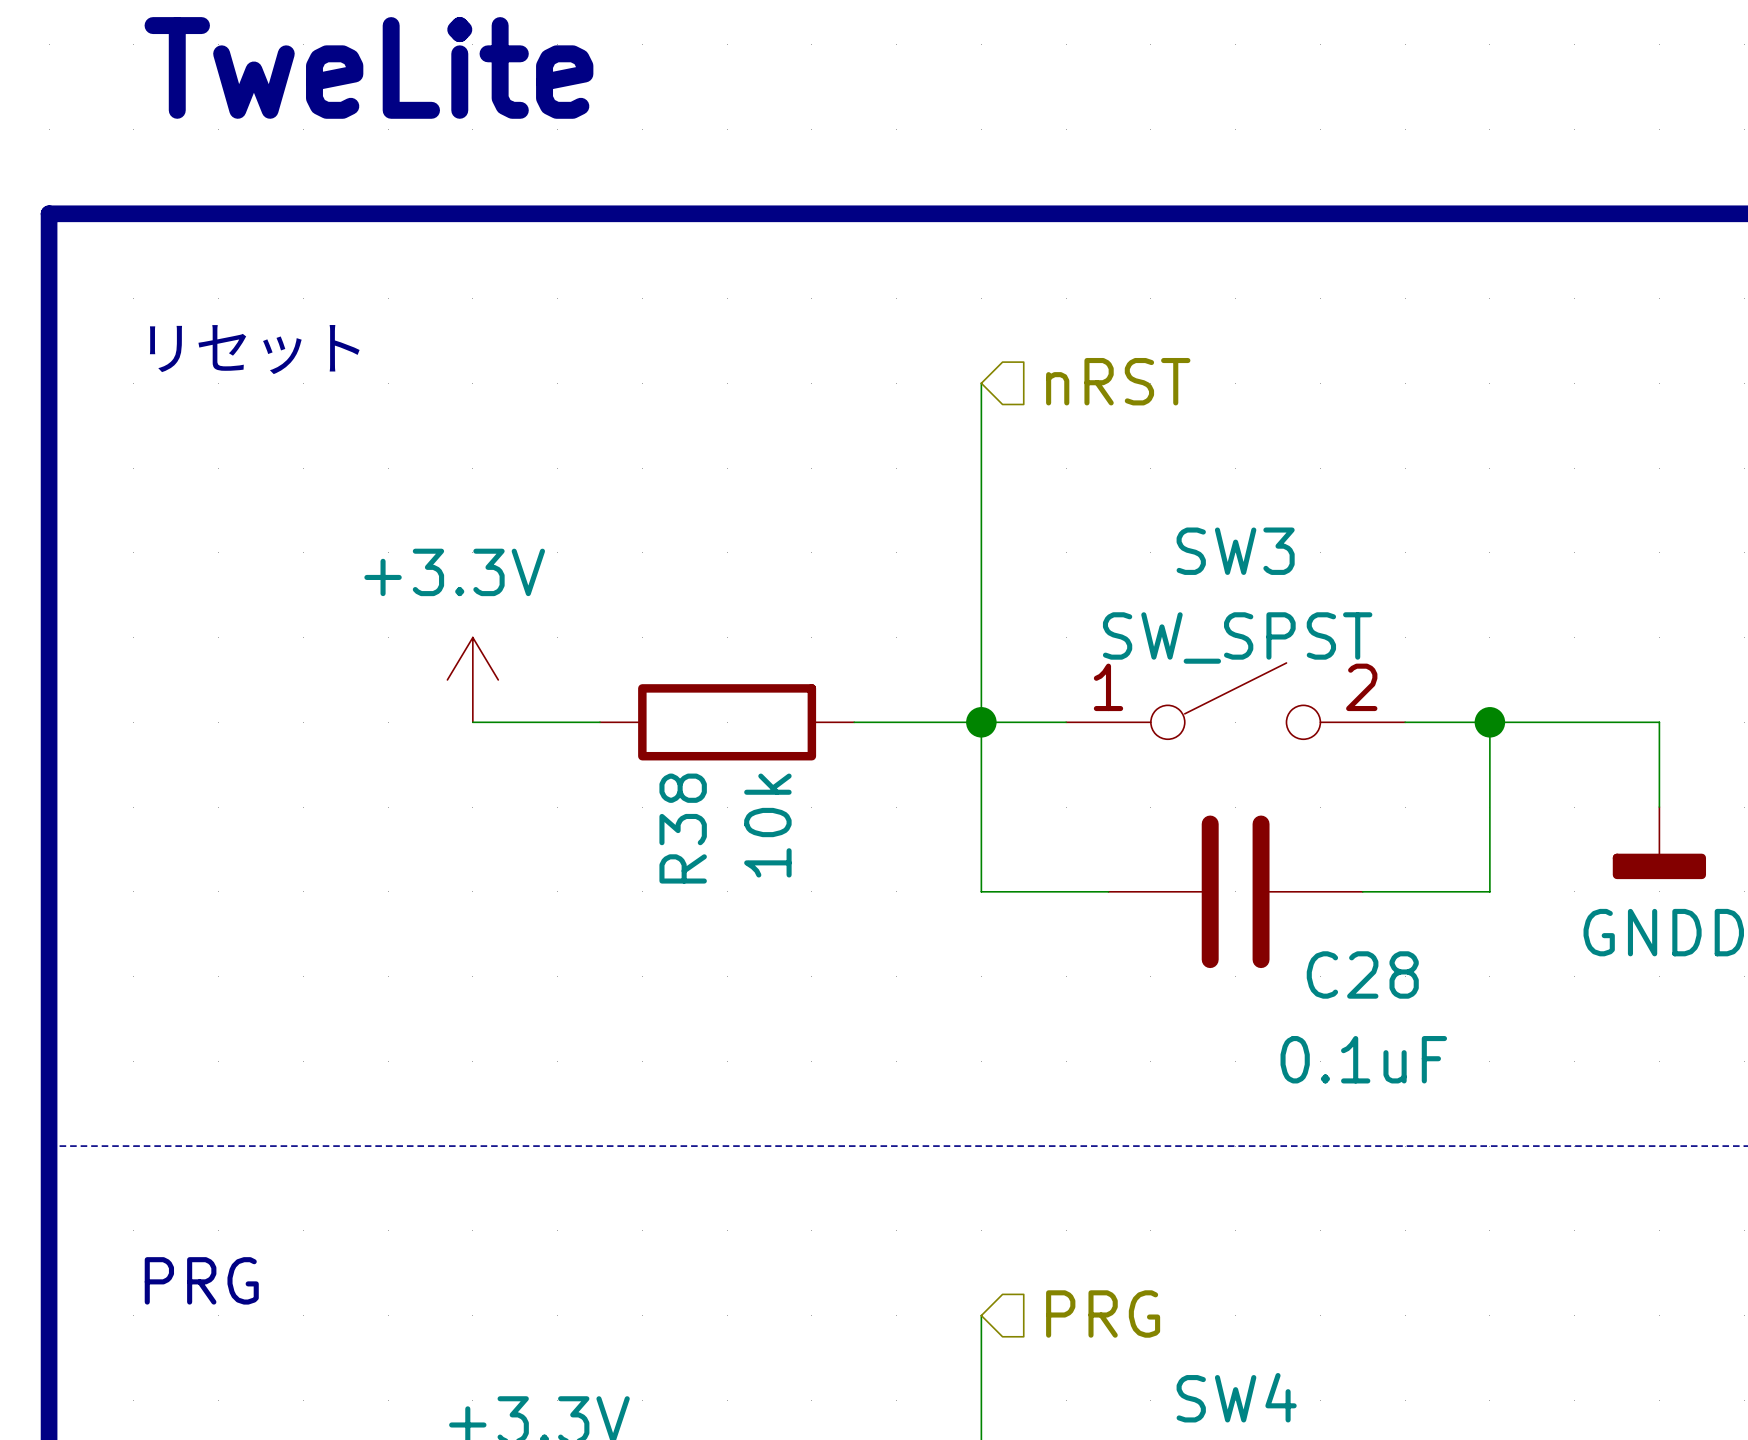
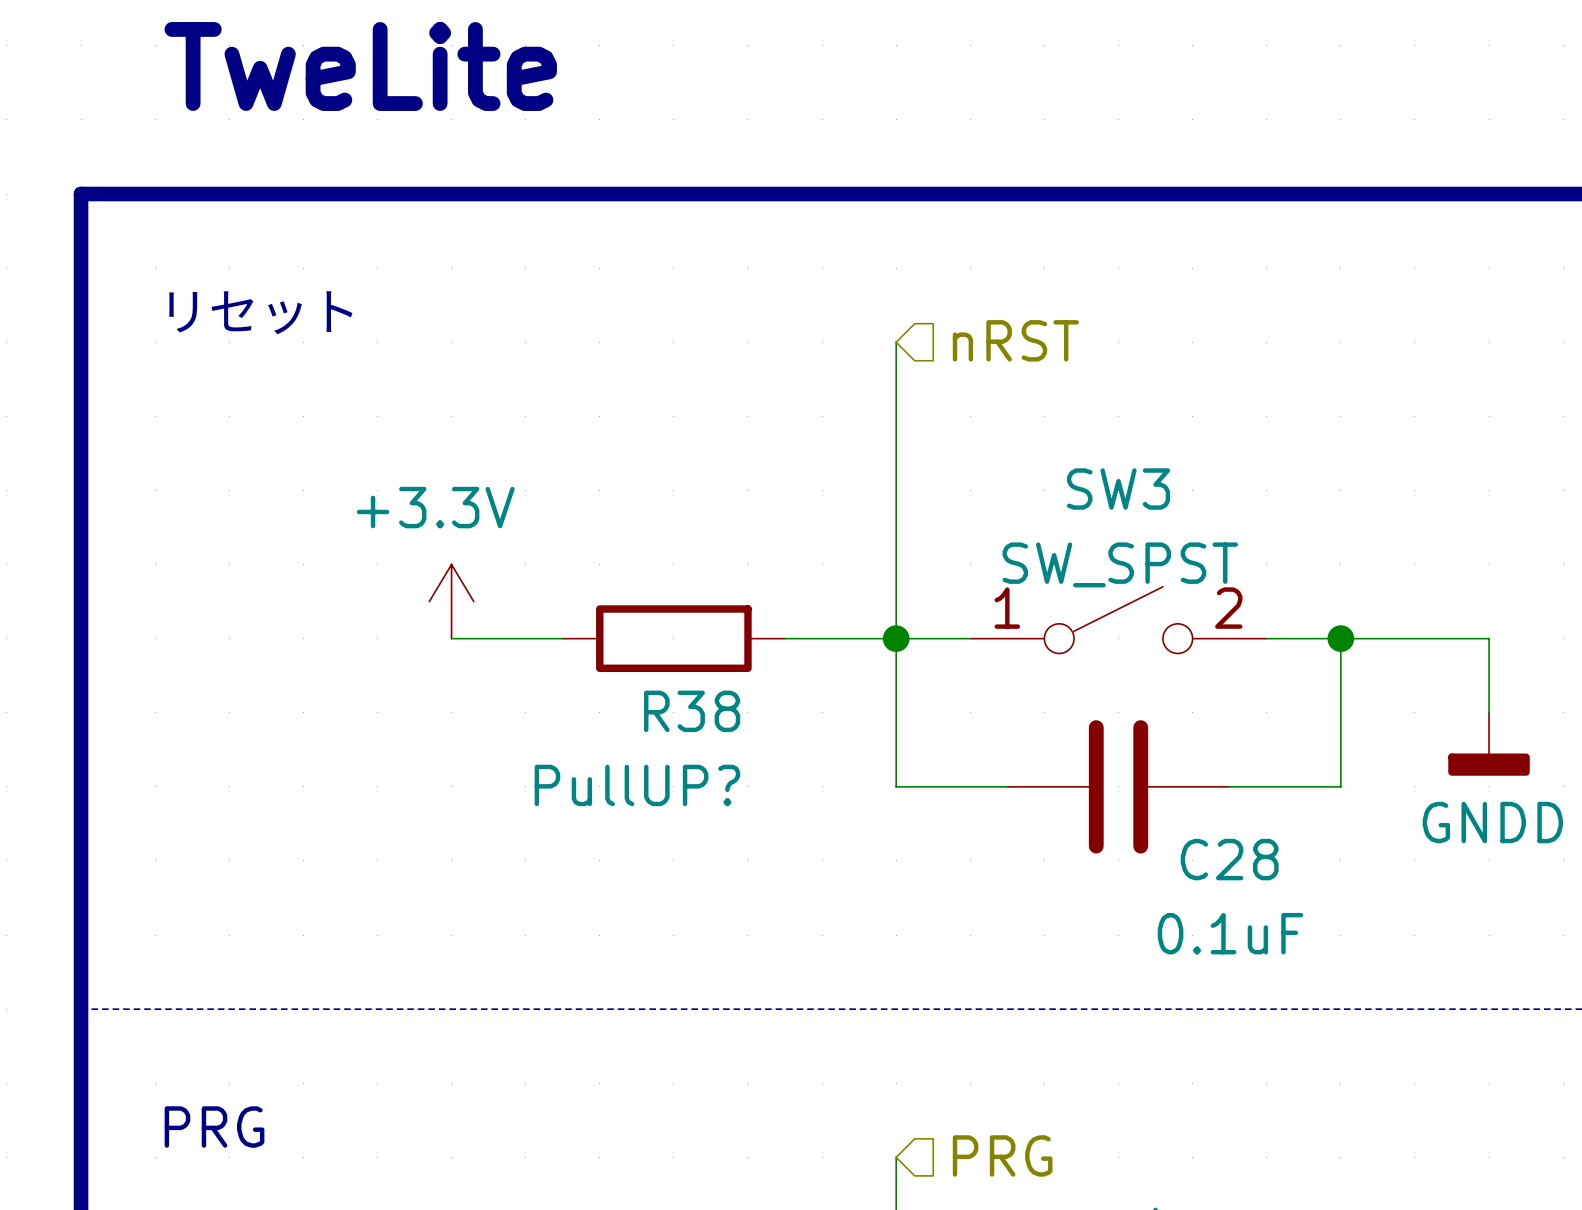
R38 value: 10k (767, 825) -> PullUP? (637, 785)
R38 name rotation: 0° (683, 828) -> 90° clockwise (692, 711)

